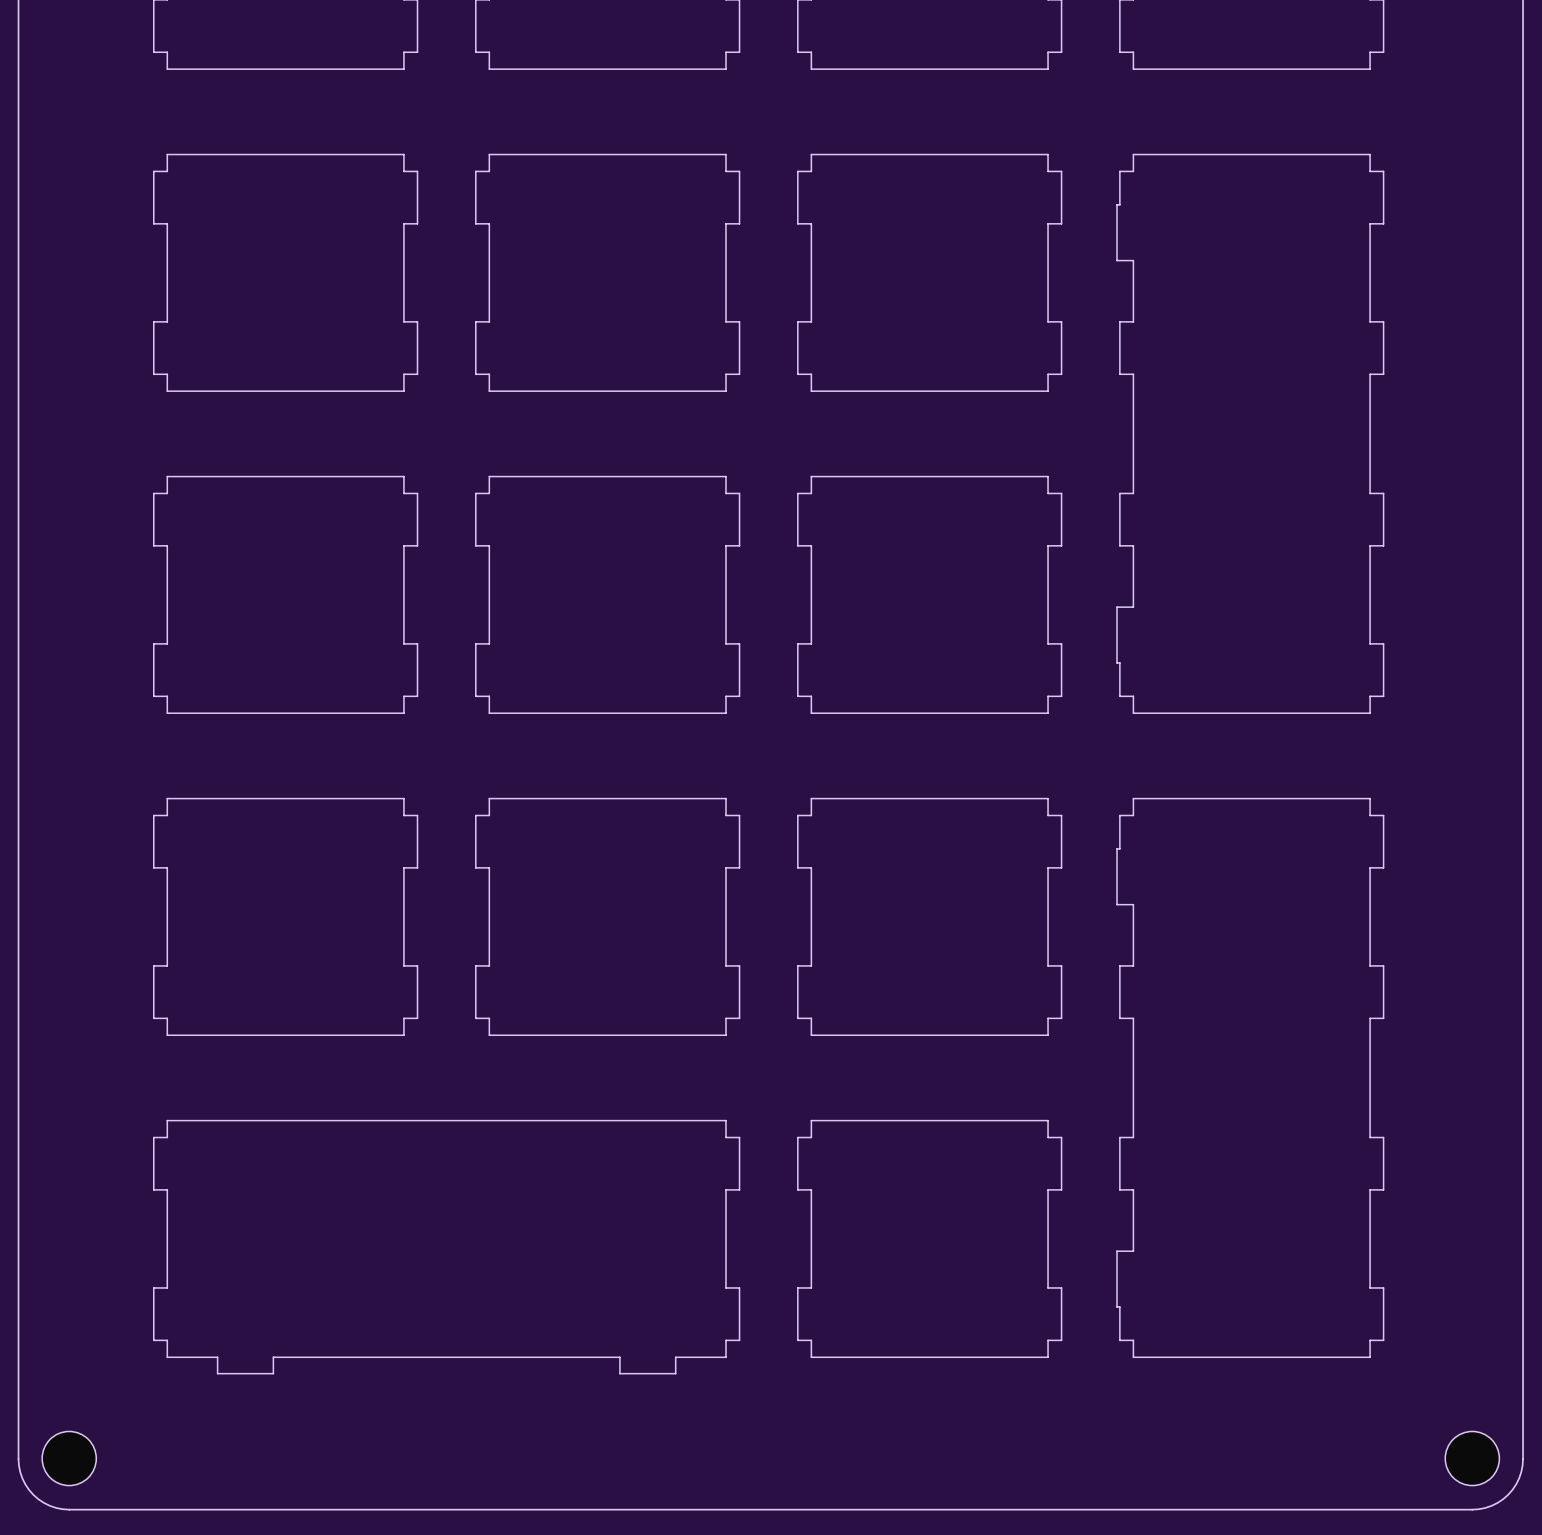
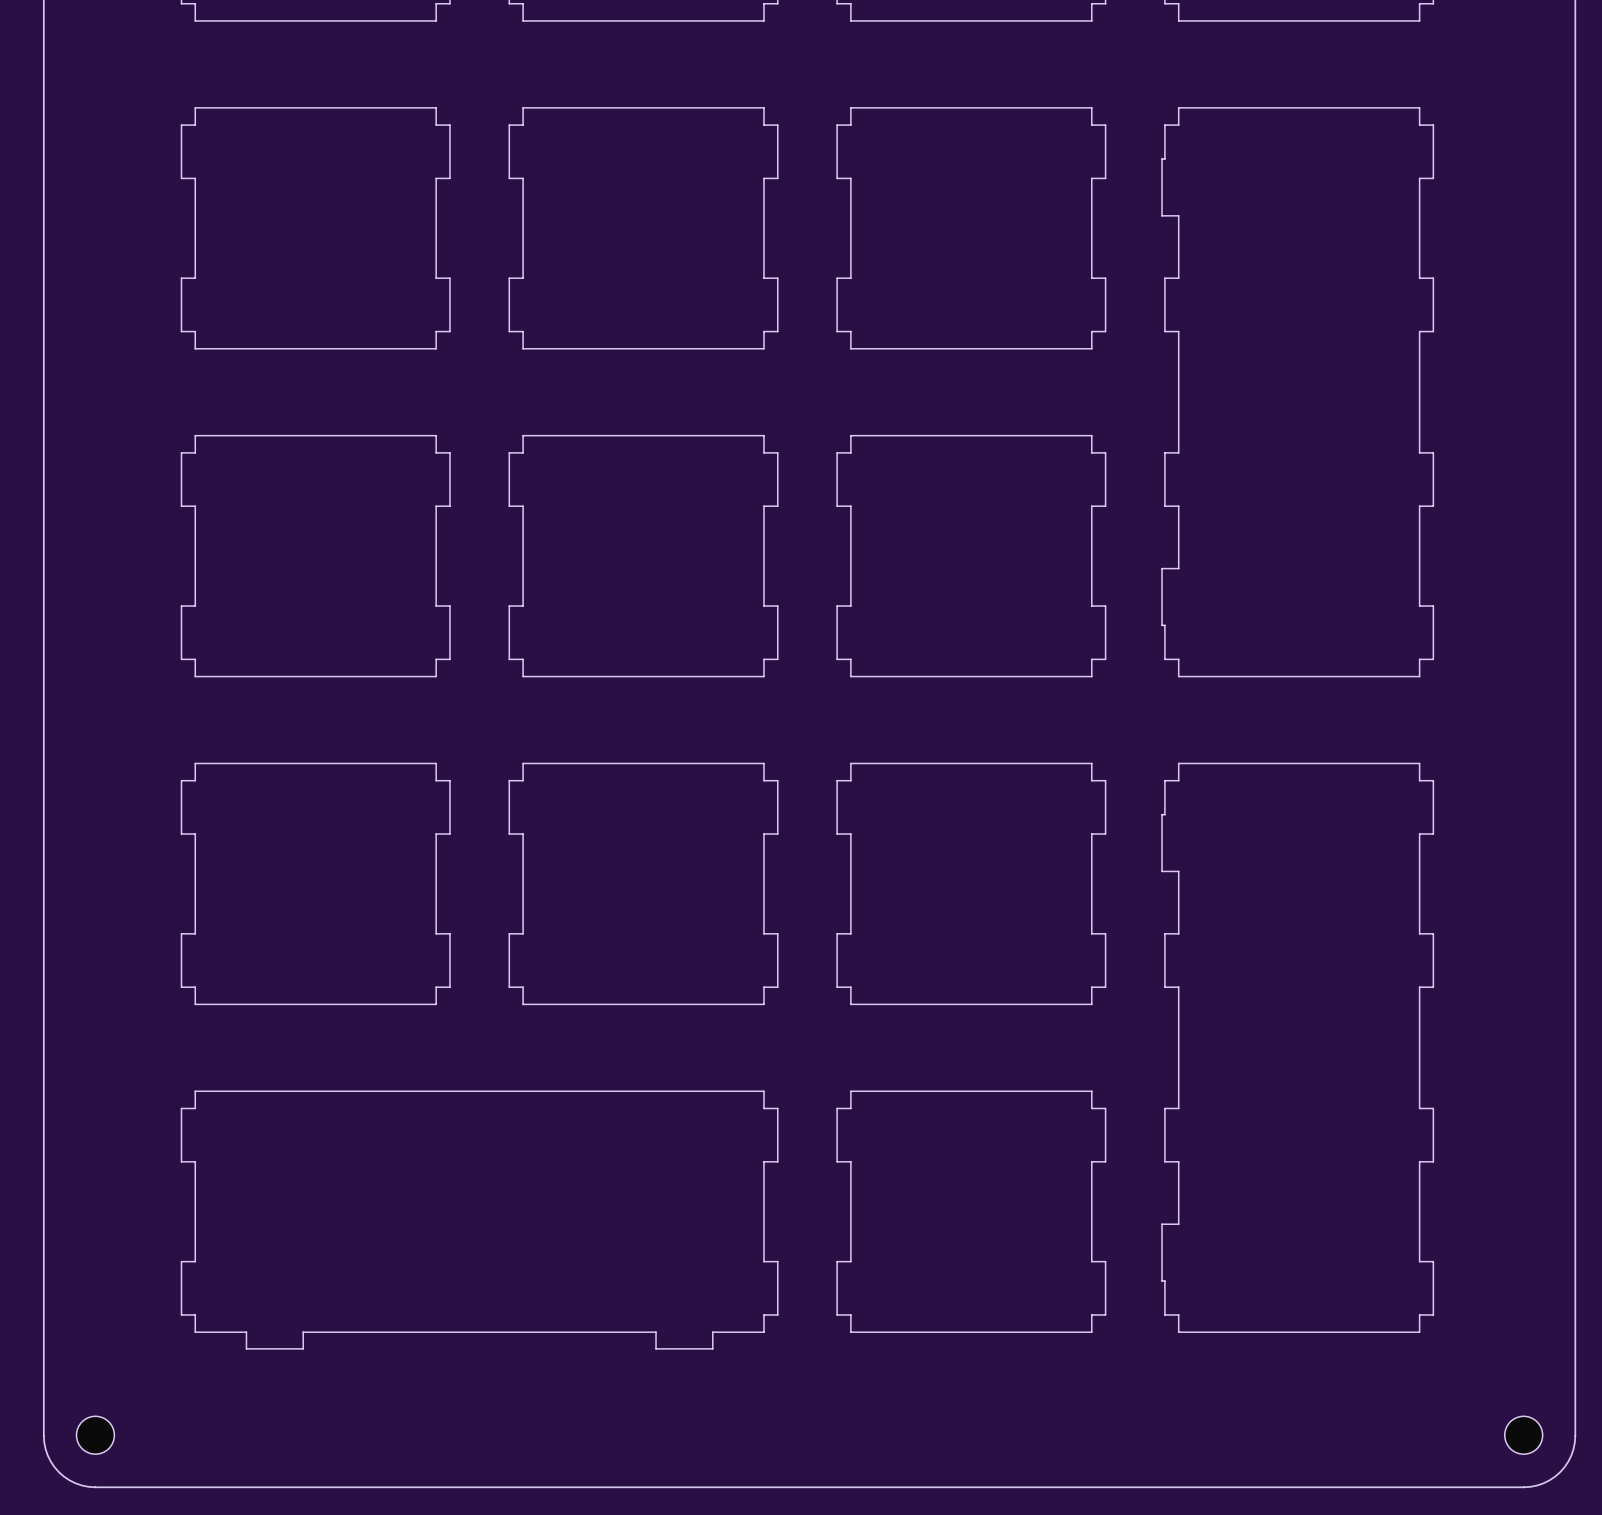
part footprint: [42, 1431, 97, 1486] -> [76, 1416, 115, 1455]
part footprint: [1445, 1431, 1500, 1486] -> [1504, 1416, 1543, 1455]

